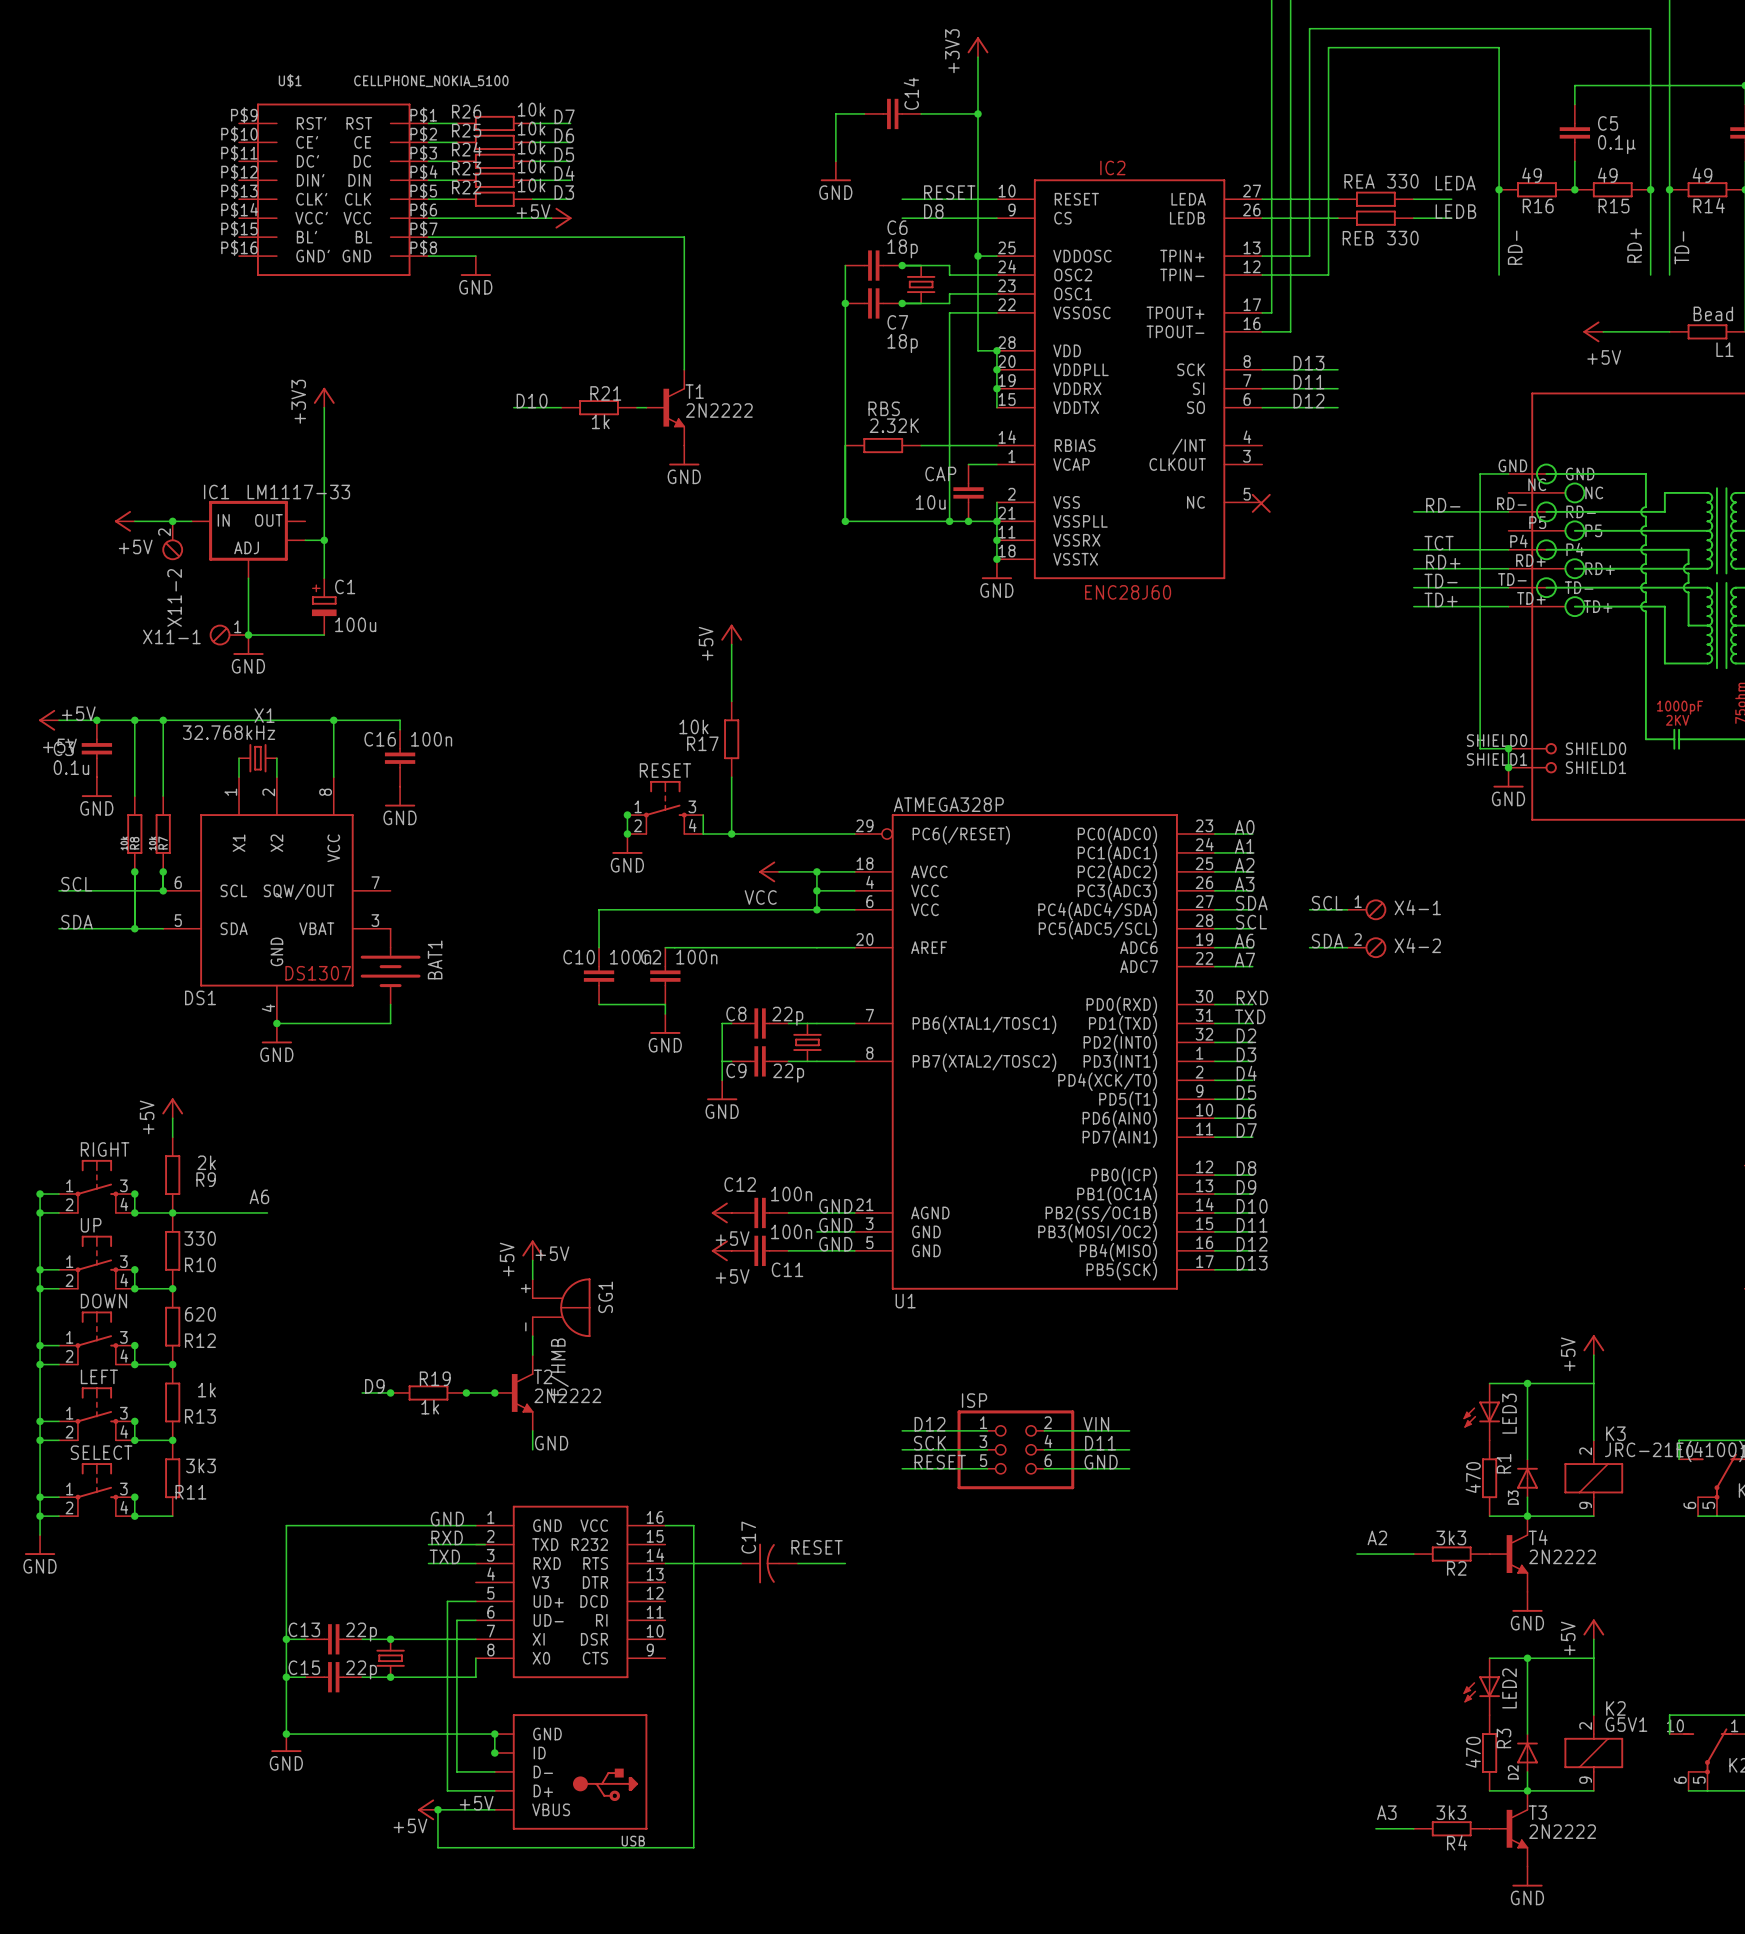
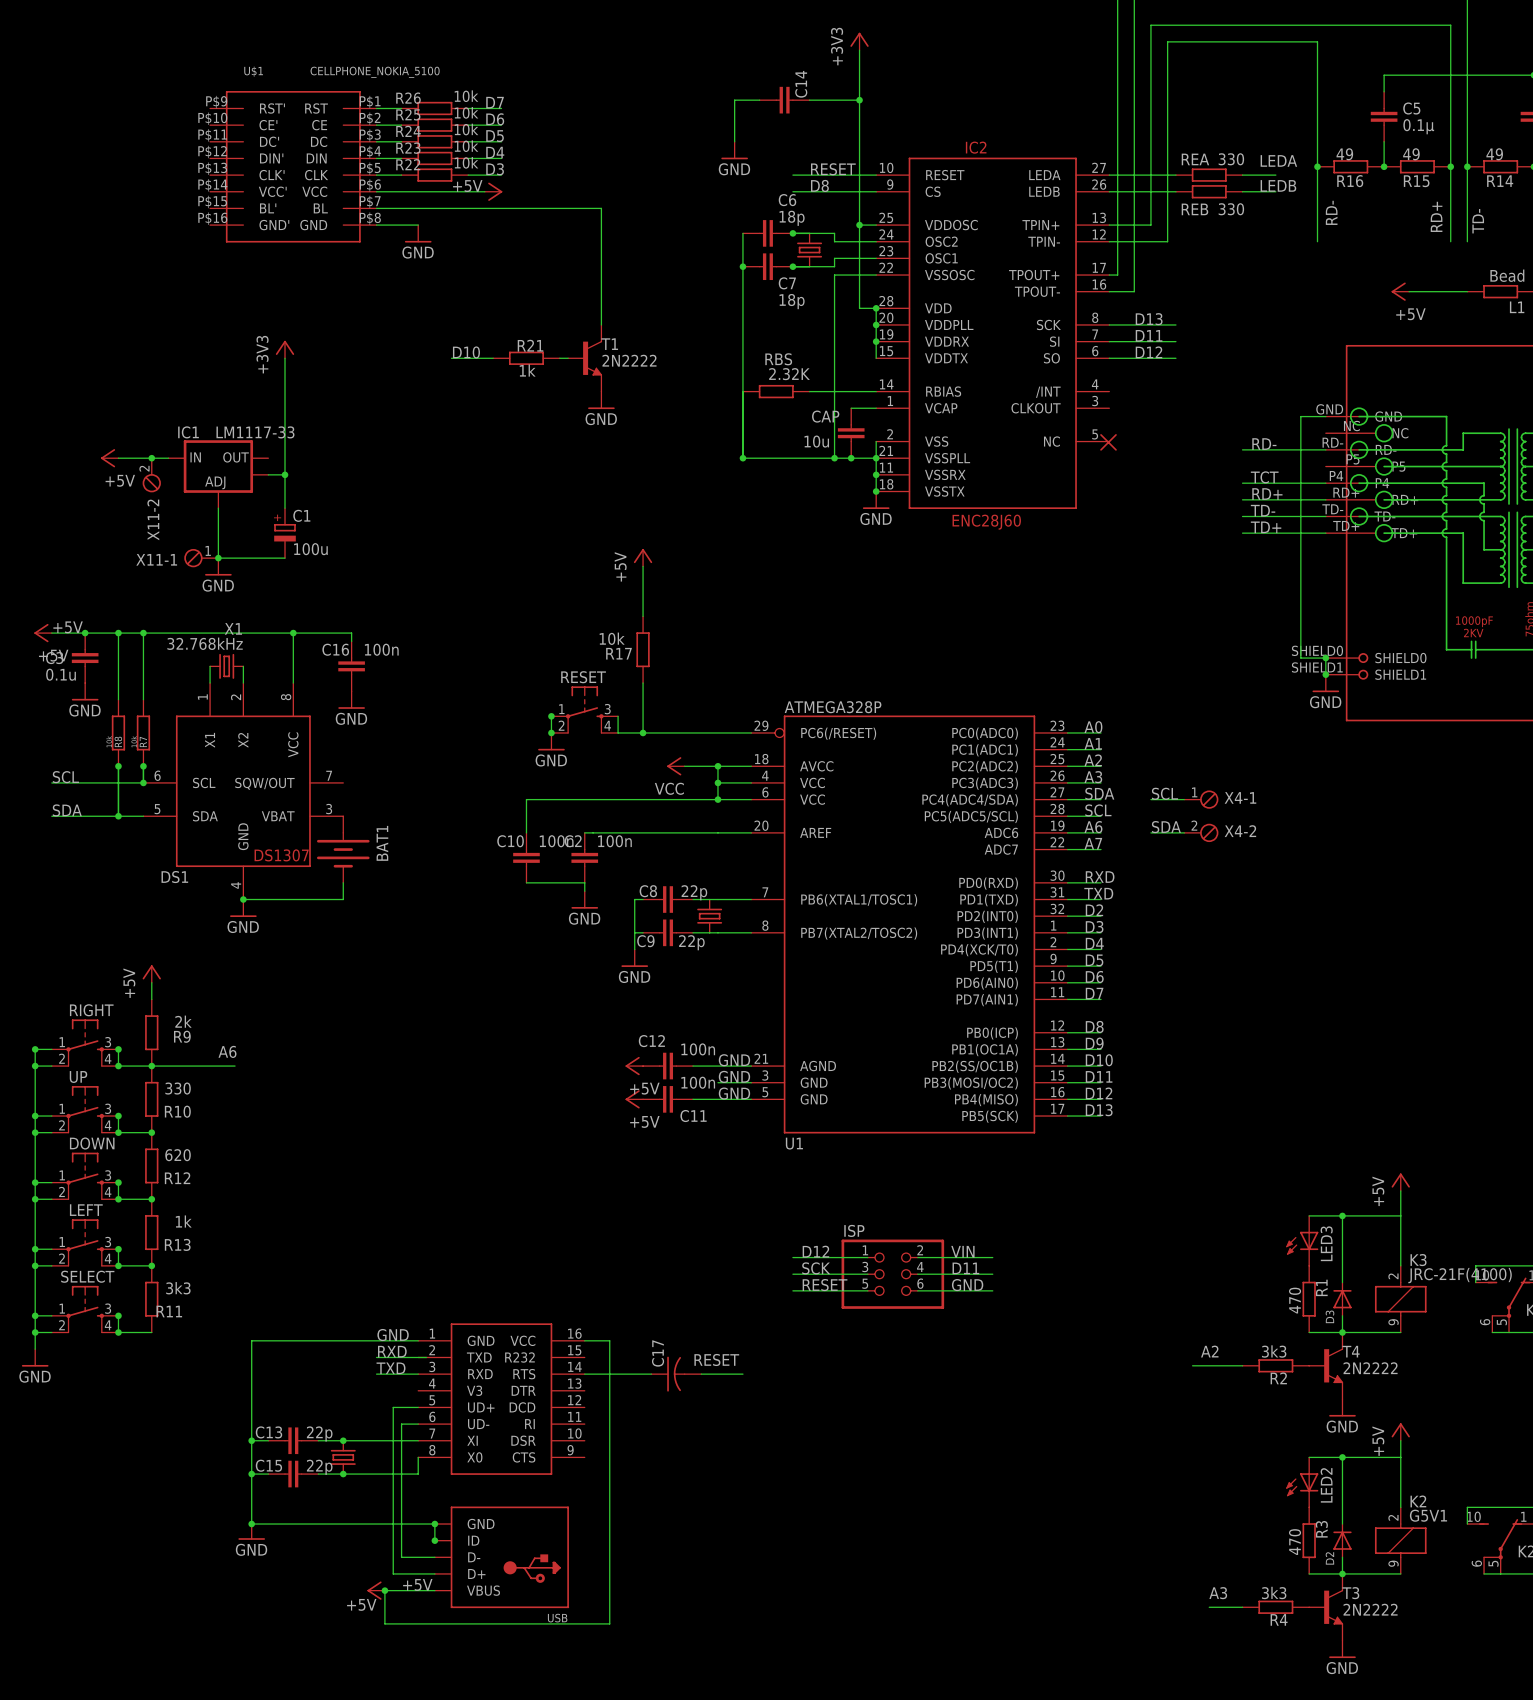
power symbol: +5V (532, 1250) -> none
label: +5V (552, 1253) -> none
wire: (532, 1260) (532, 1279) -> none
SG1: F/HMB (561, 1307) -> none
wire: (532, 1336) (532, 1355) -> none
label: D9 (374, 1386) -> none
wire: (362, 1392) (390, 1392) -> none
junction: (390, 1392) -> none
R19: 1k (428, 1392) -> none
wire: (466, 1392) (494, 1392) -> none
junction: (466, 1392) -> none
junction: (494, 1392) -> none
T2: 2N2222 (514, 1392) -> none
wire: (532, 1430) (532, 1449) -> none
label: GND (551, 1443) -> none

